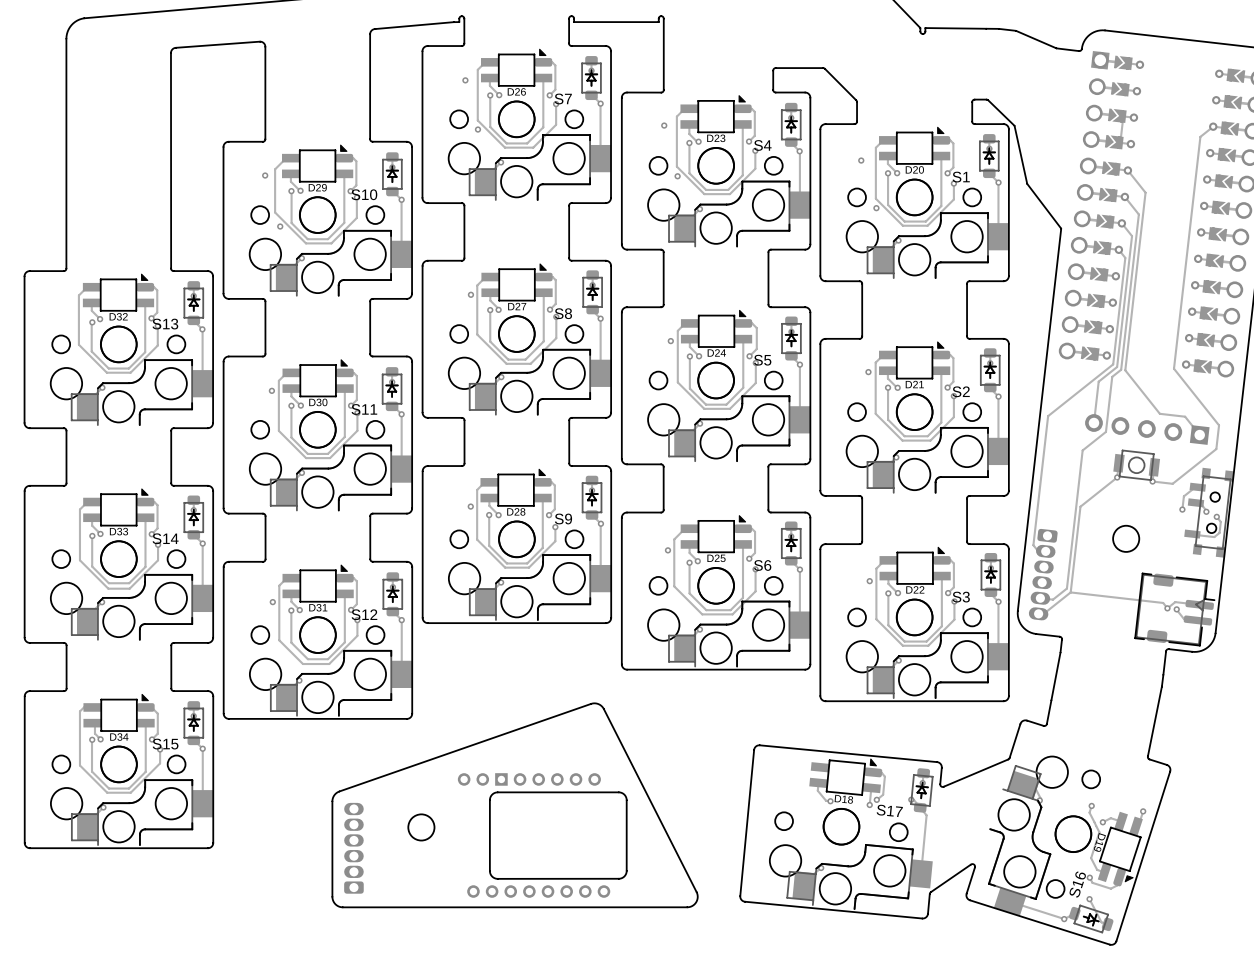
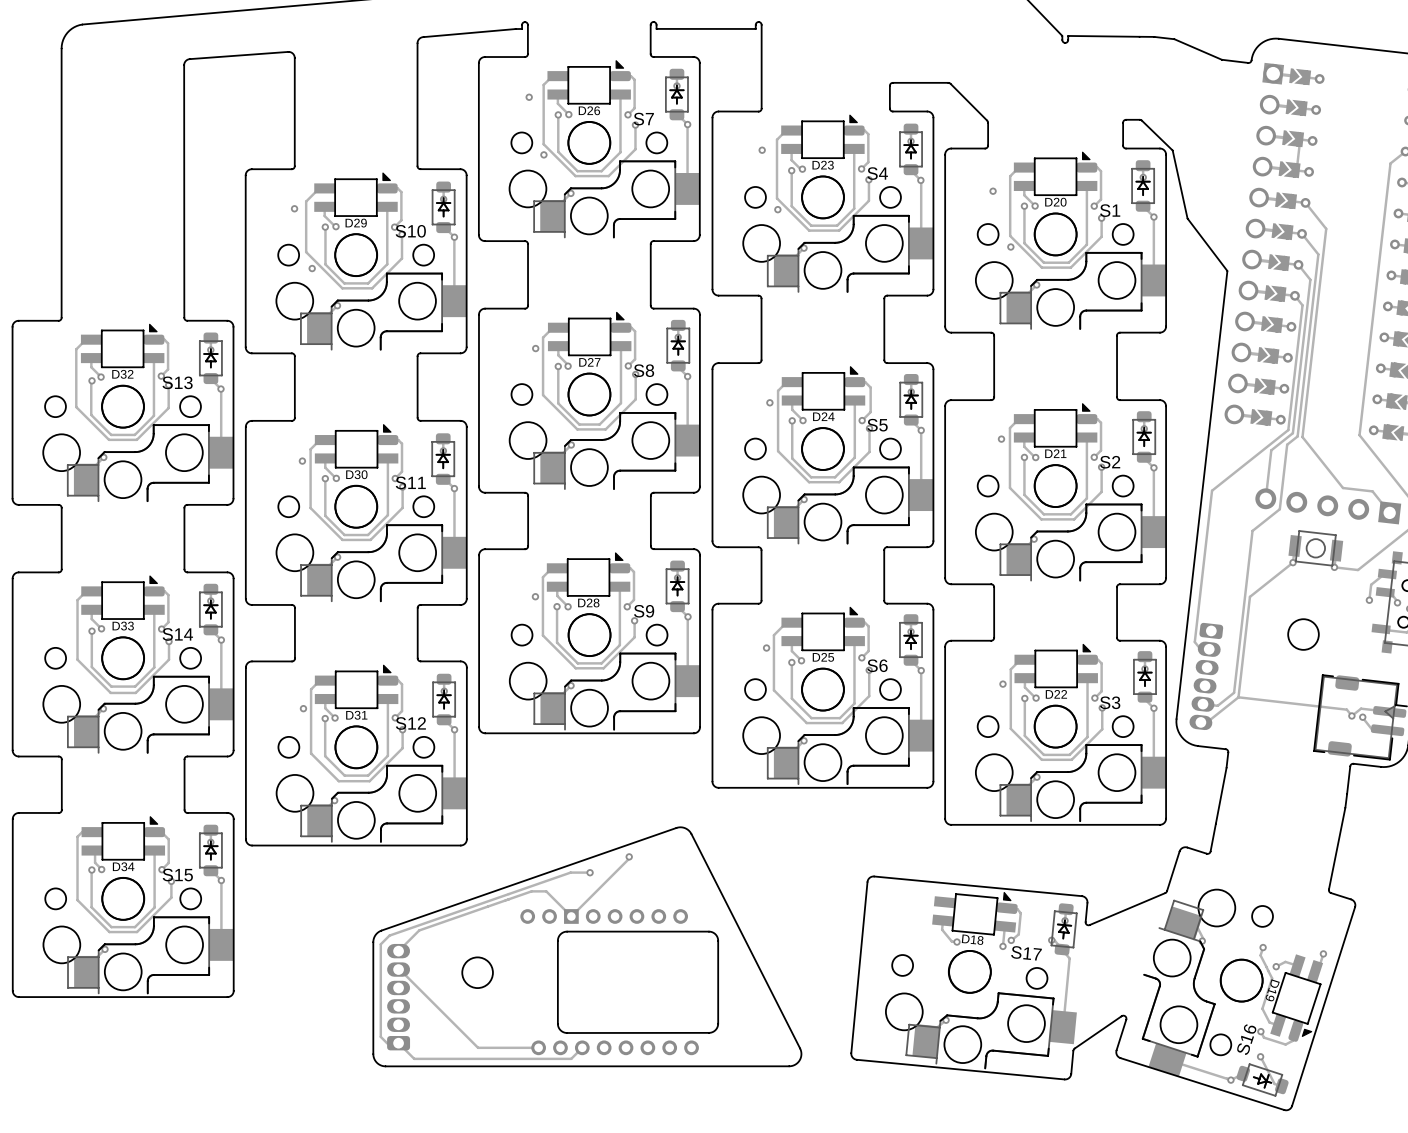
track: none -> (629, 856) (571, 916) (546, 891) (531, 891) (419, 930) (398, 951)
via: none -> (629, 856)
track: none -> (589, 872) (570, 872) (389, 935) (380, 944) (380, 1036) (387, 1043) (398, 1043) (414, 1058) (571, 1058) (582, 1047)
via: none -> (590, 872)
track: none -> (398, 969) (478, 1047) (538, 1047)

